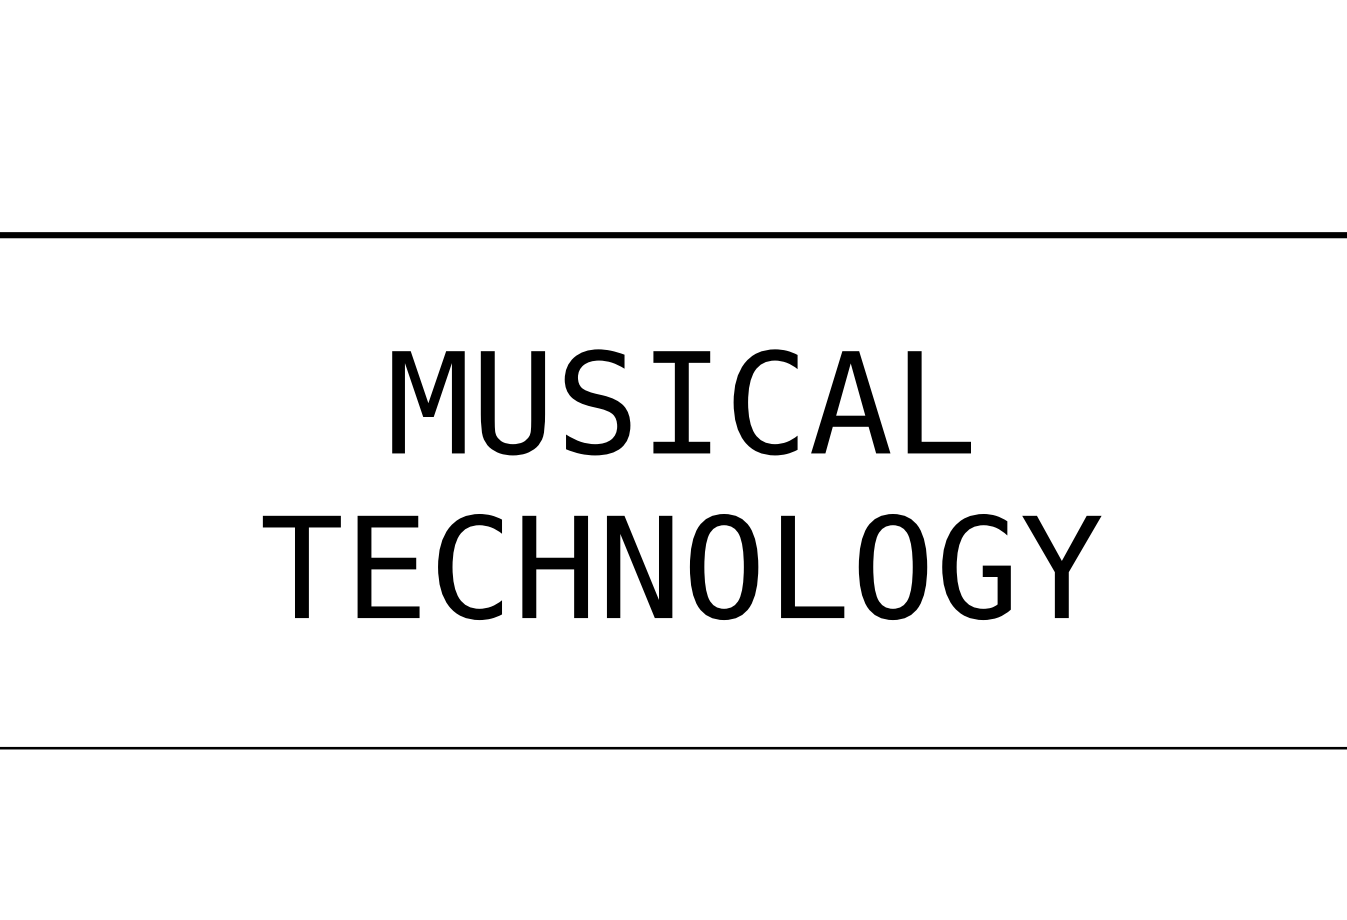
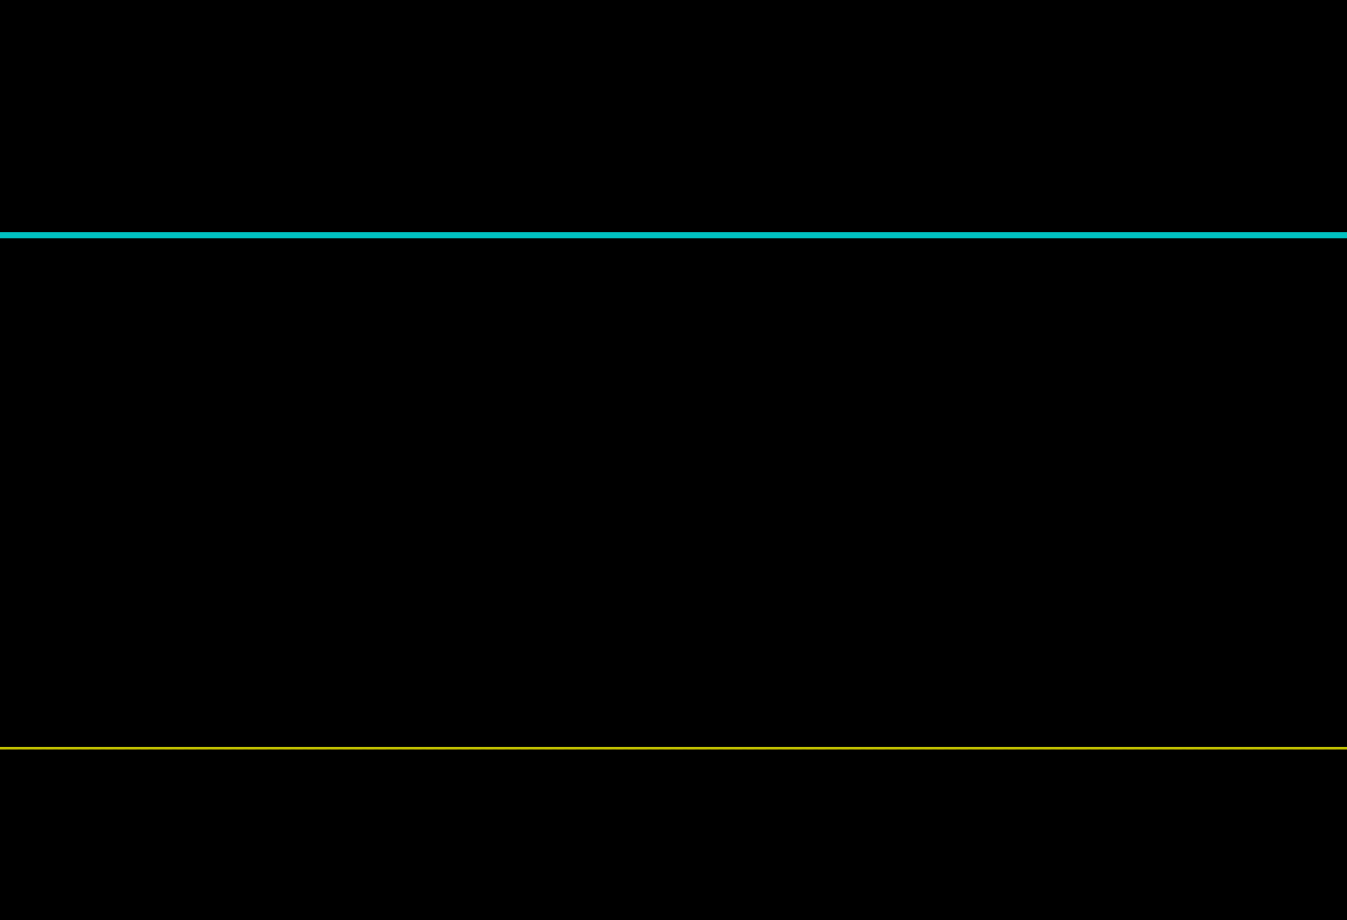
text: MUSICAL (681, 402) -> none
text: TECHNOLOGY (682, 567) -> none

